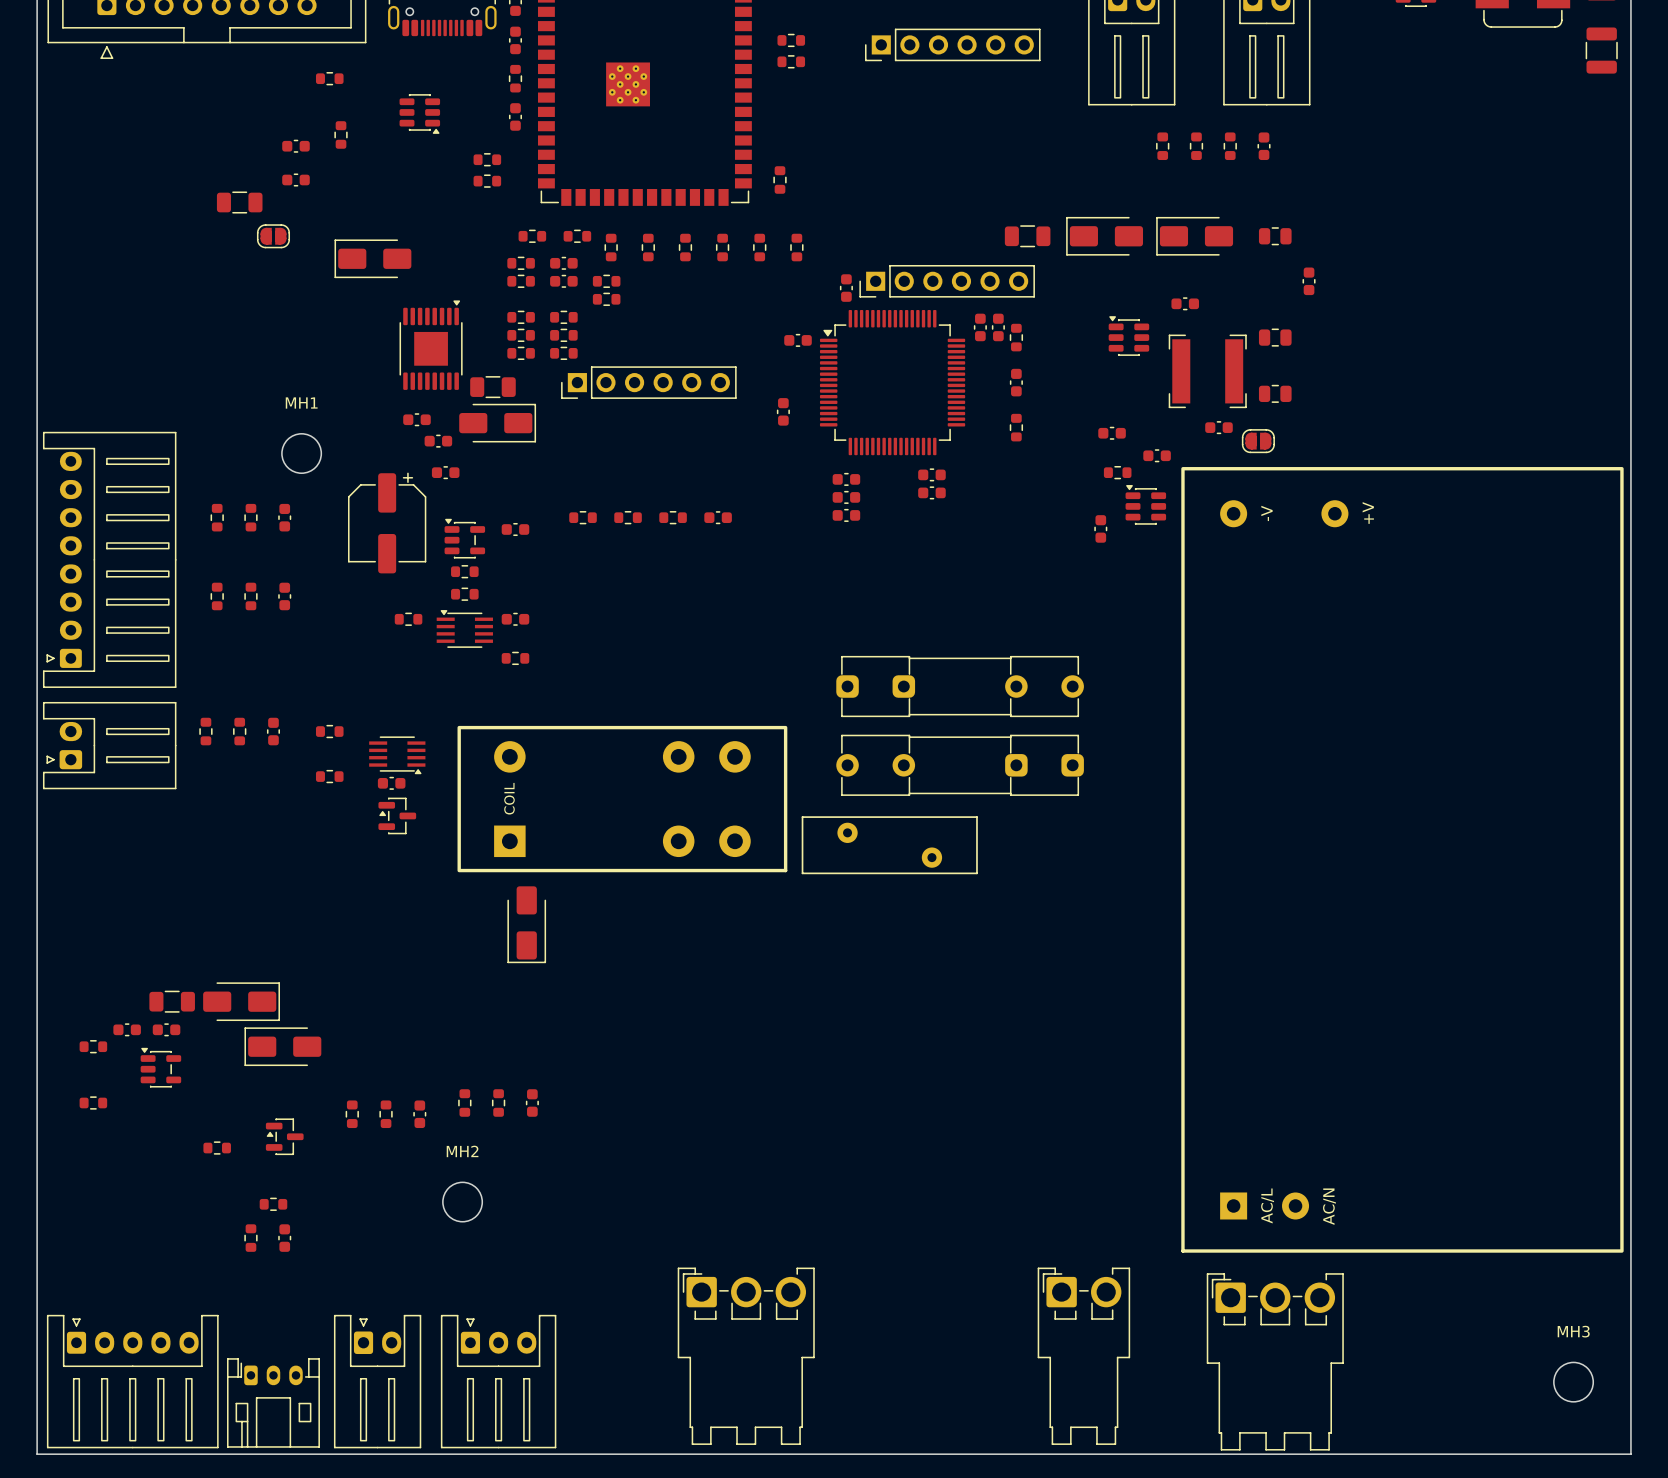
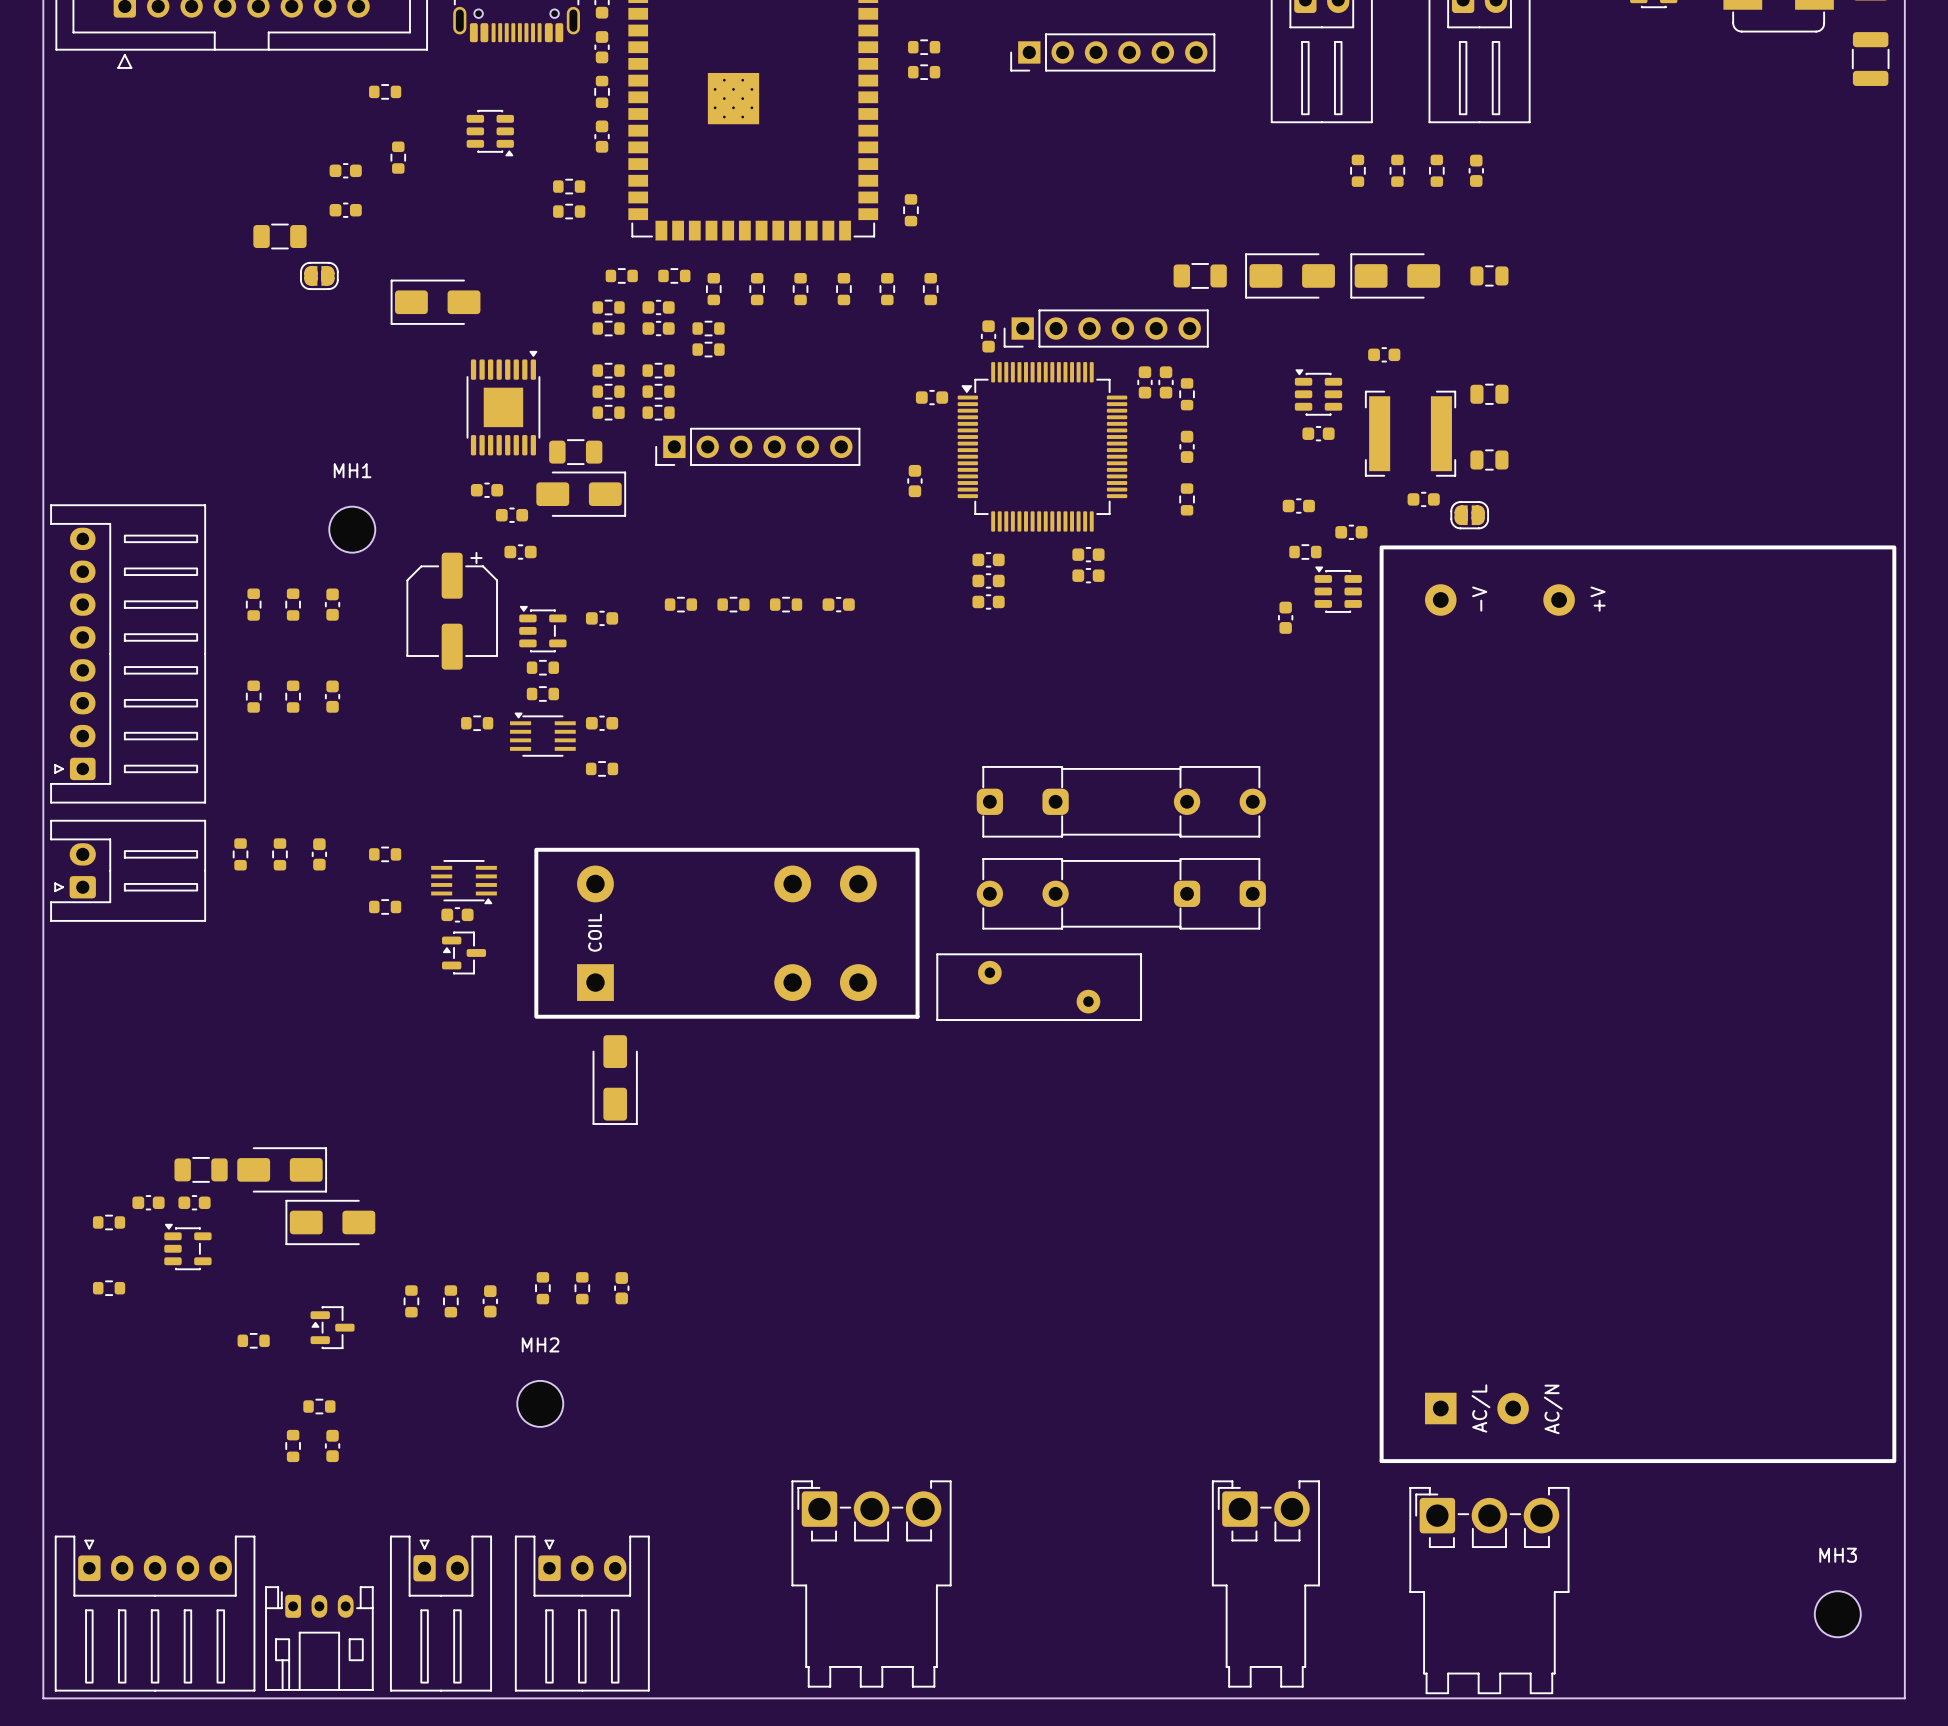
part rotation: 0° (1309, 281) -> 90° clockwise (1318, 433)
part position: (1309, 281) -> (1318, 433)

